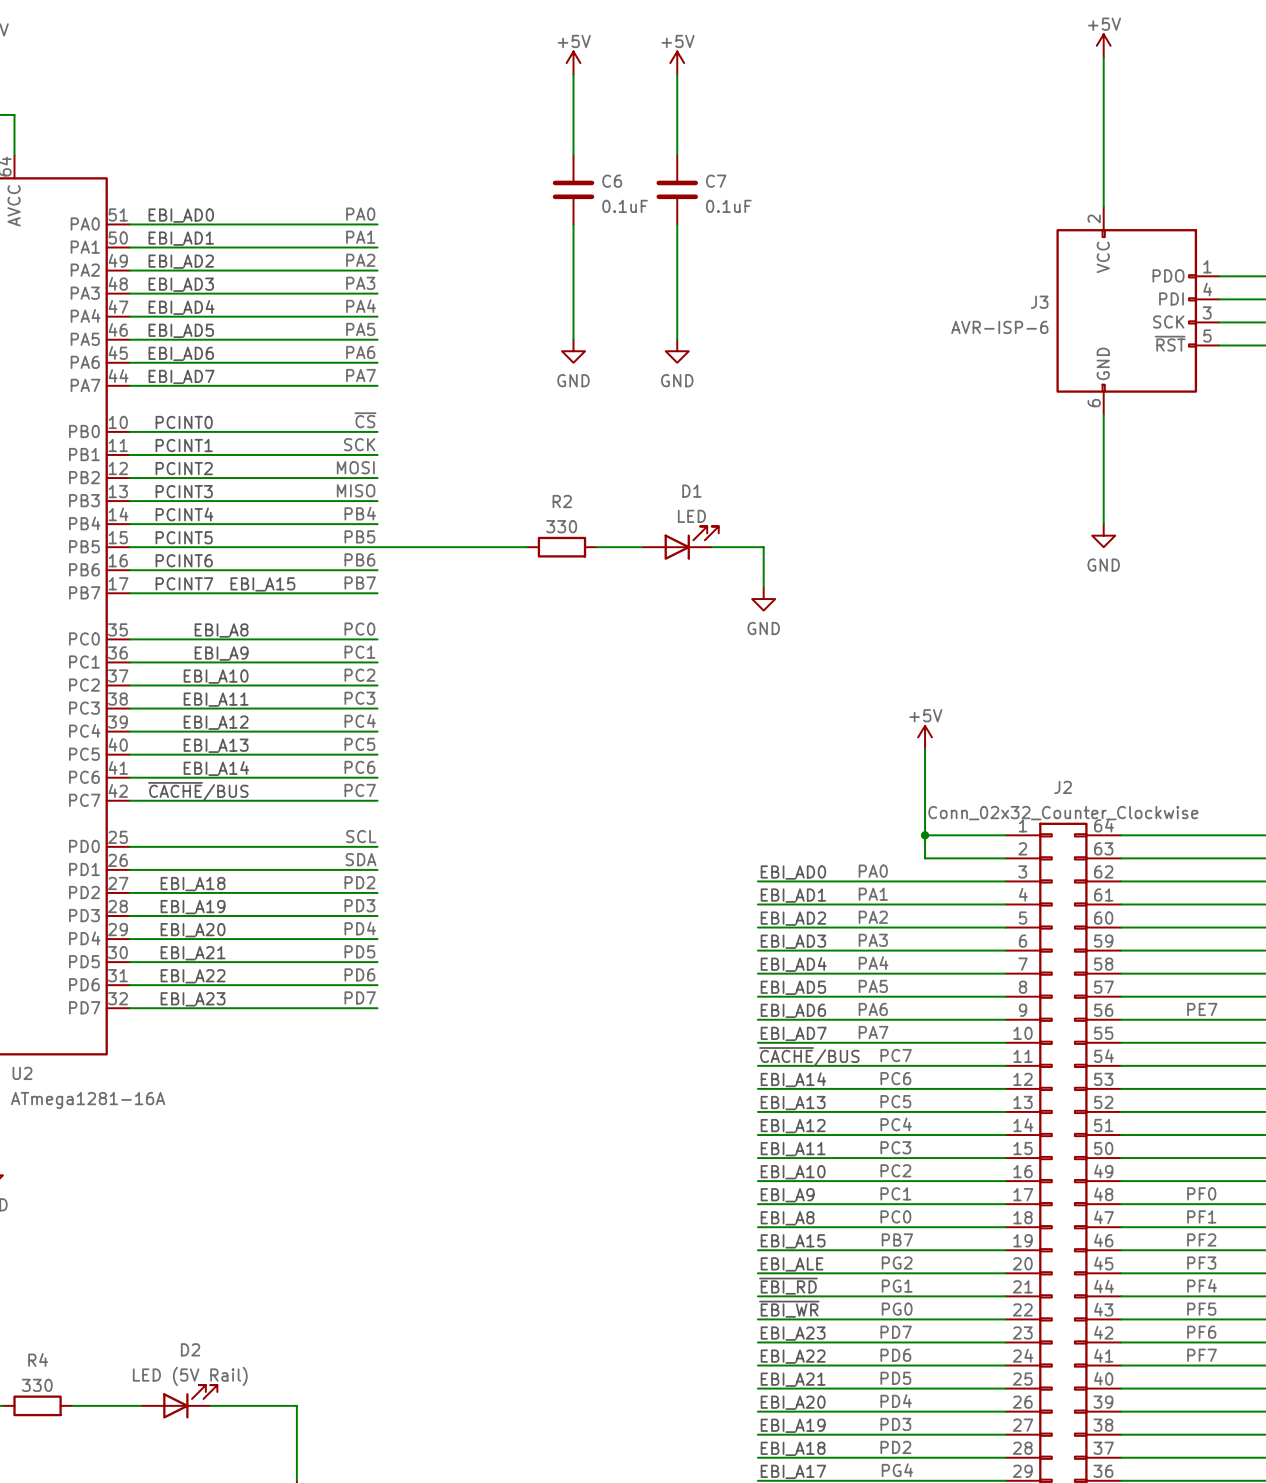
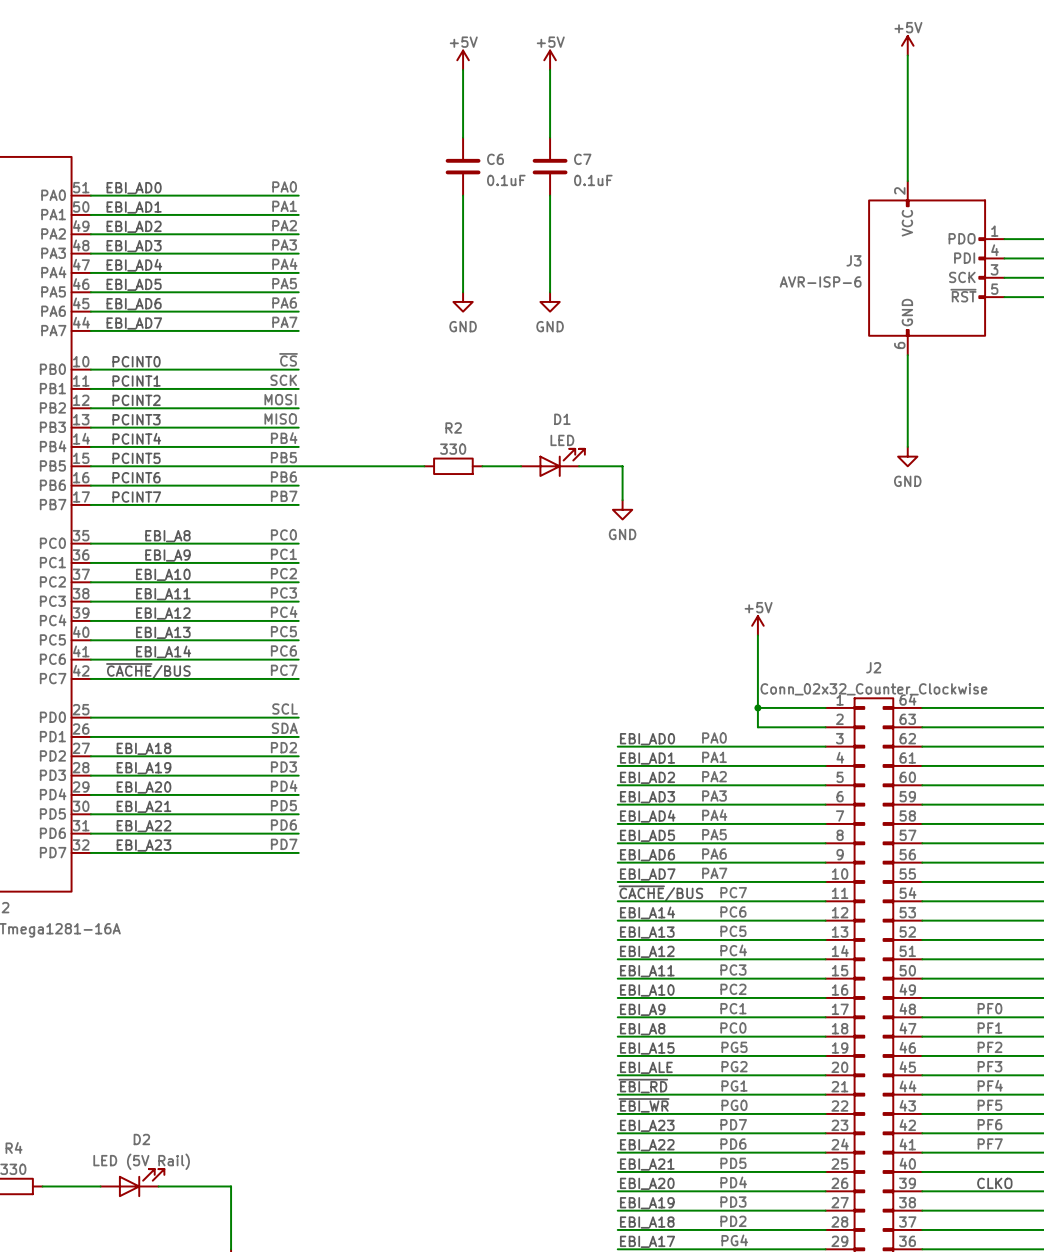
text: EBI_A15 (262, 584) -> none
label: PE7 (1202, 1009) -> none
label: PB7 (897, 1239) -> PG5 (734, 1047)
text: none -> CLKO (994, 1183)

